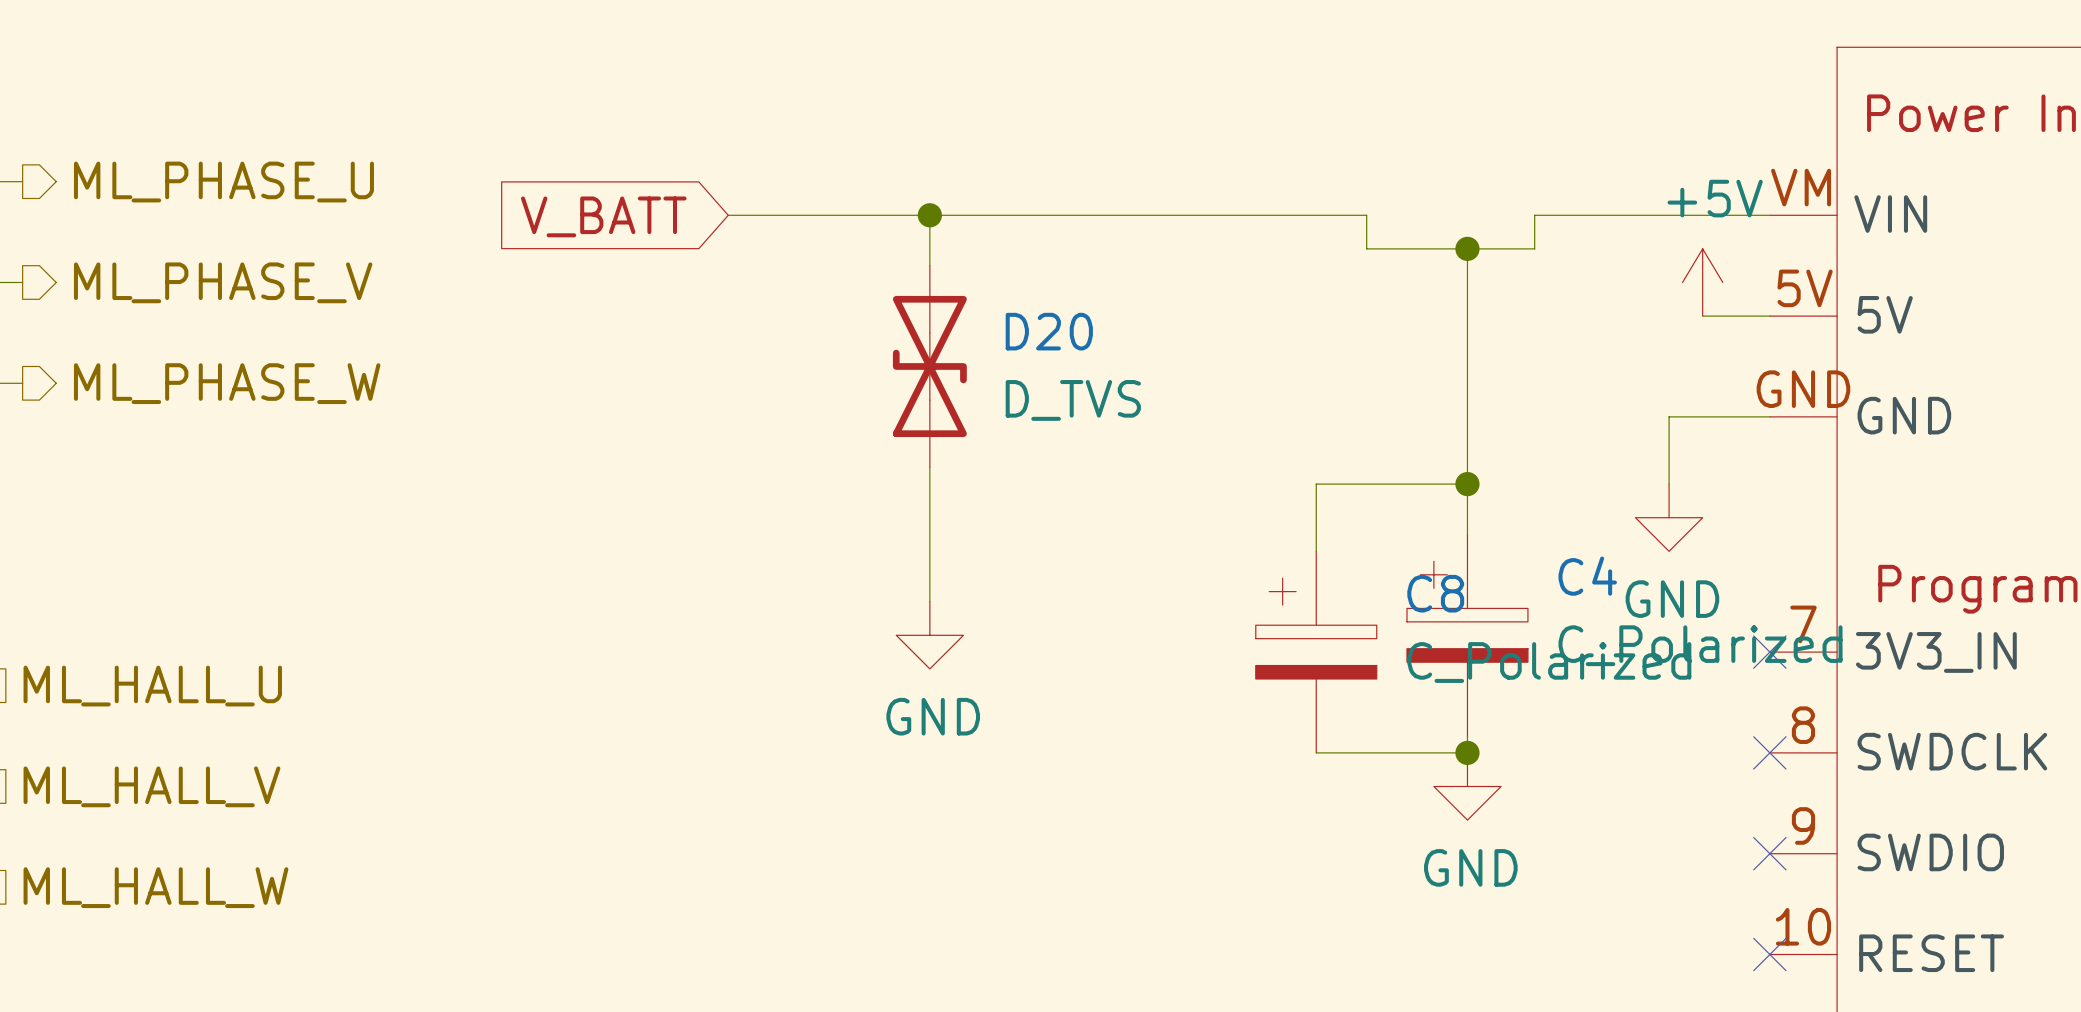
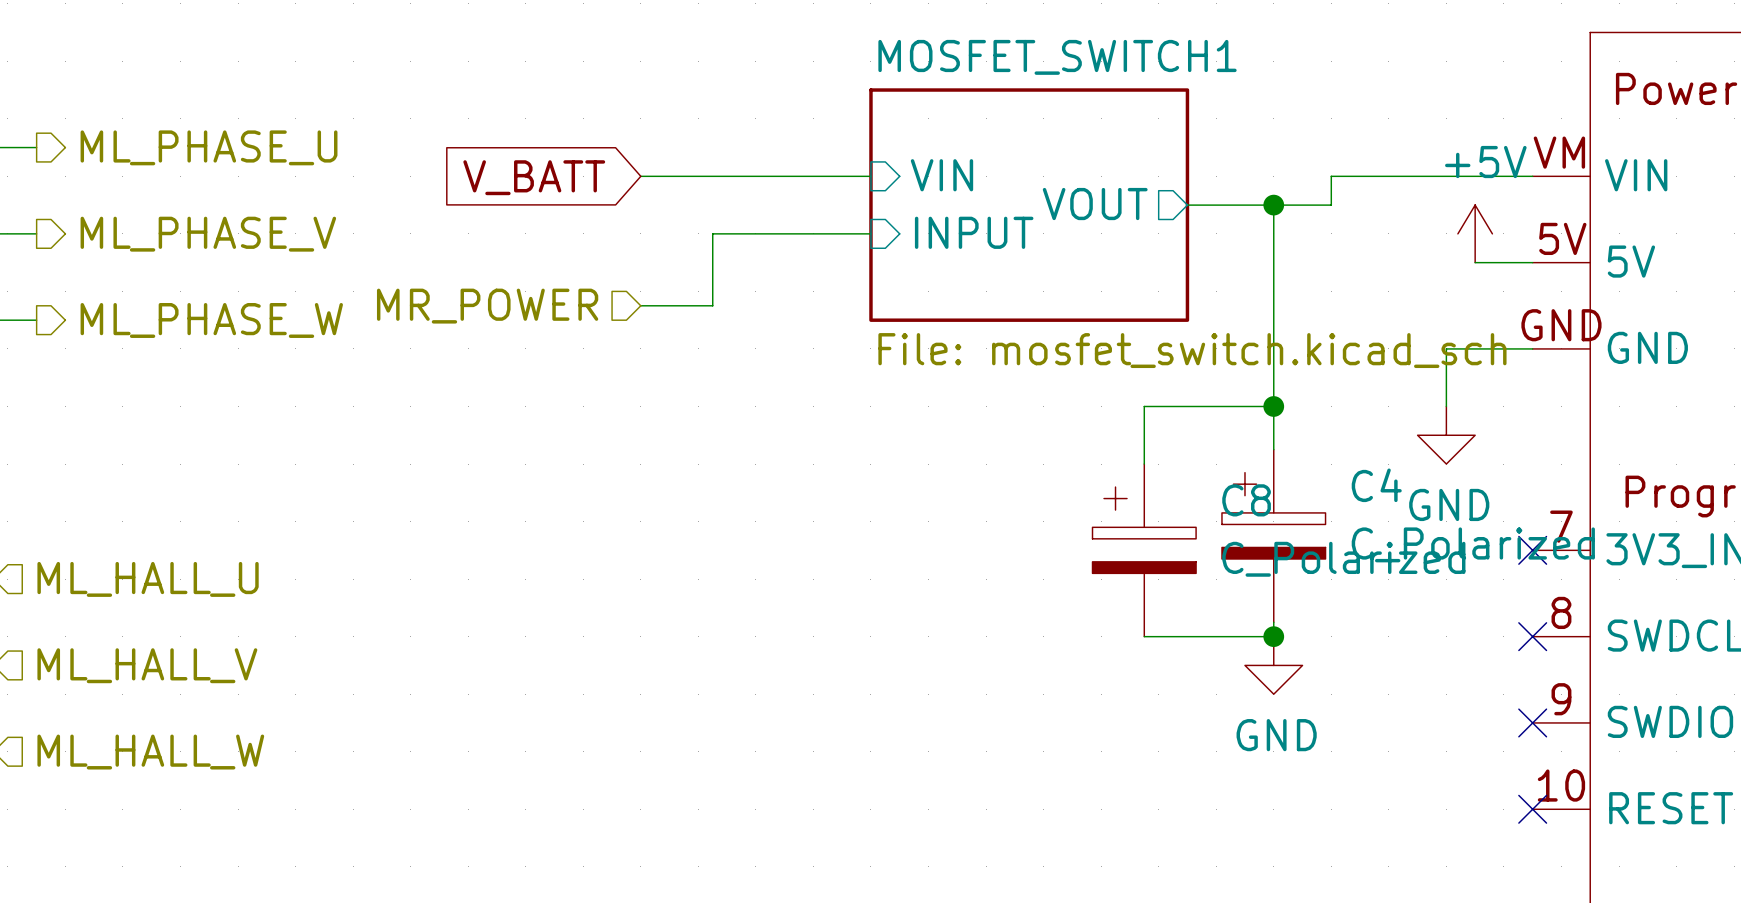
sheet pin: none -> VIN (941, 175)
wire: (929, 215) (929, 265) -> none
junction: (929, 215) -> none
wire: (997, 215) (1366, 215) (1366, 248) -> none
sheet pin: none -> VOUT (1095, 204)
sheet MOSFET_SWITCH1: none -> File: mosfet_switch.kicad_sch (1029, 205)
sheet pin: none -> INPUT (974, 232)
wire: none -> (870, 233) (712, 233) (712, 305) (640, 305)
hierarchical label: none -> MR_POWER (487, 306)
D20: D_TVS (929, 366) -> none
wire: (929, 467) (929, 601) -> none
power symbol: GND (929, 635) -> none

